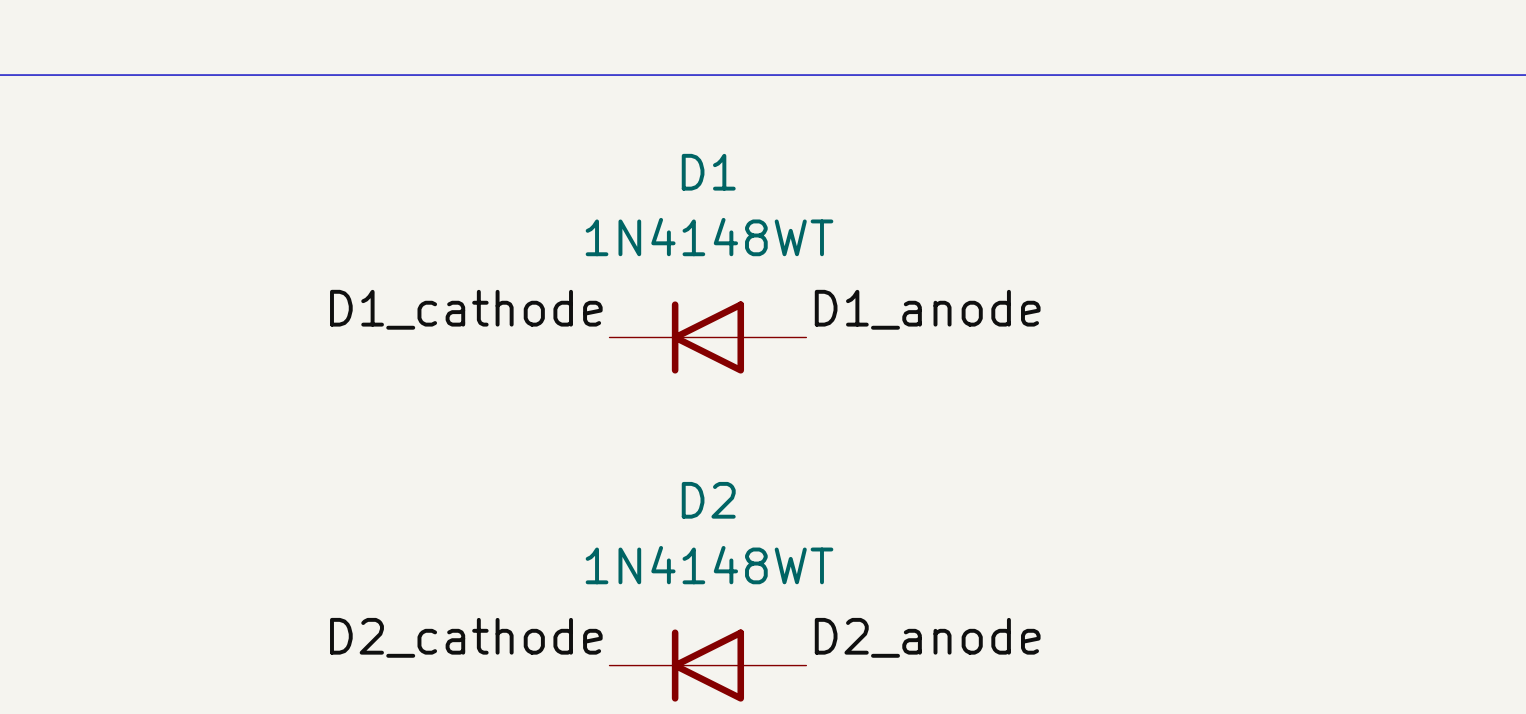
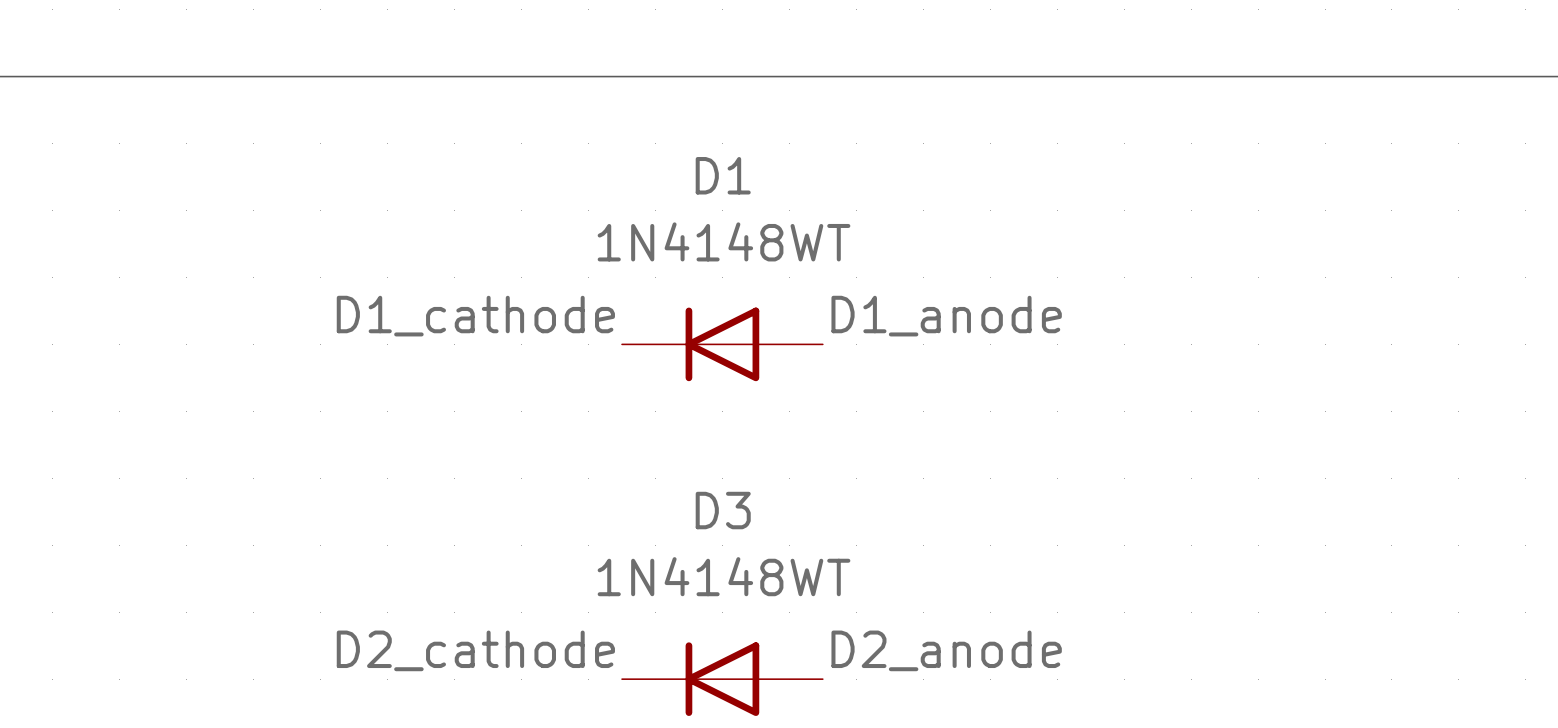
D2 name: D2 (708, 500) -> D3 (723, 510)

